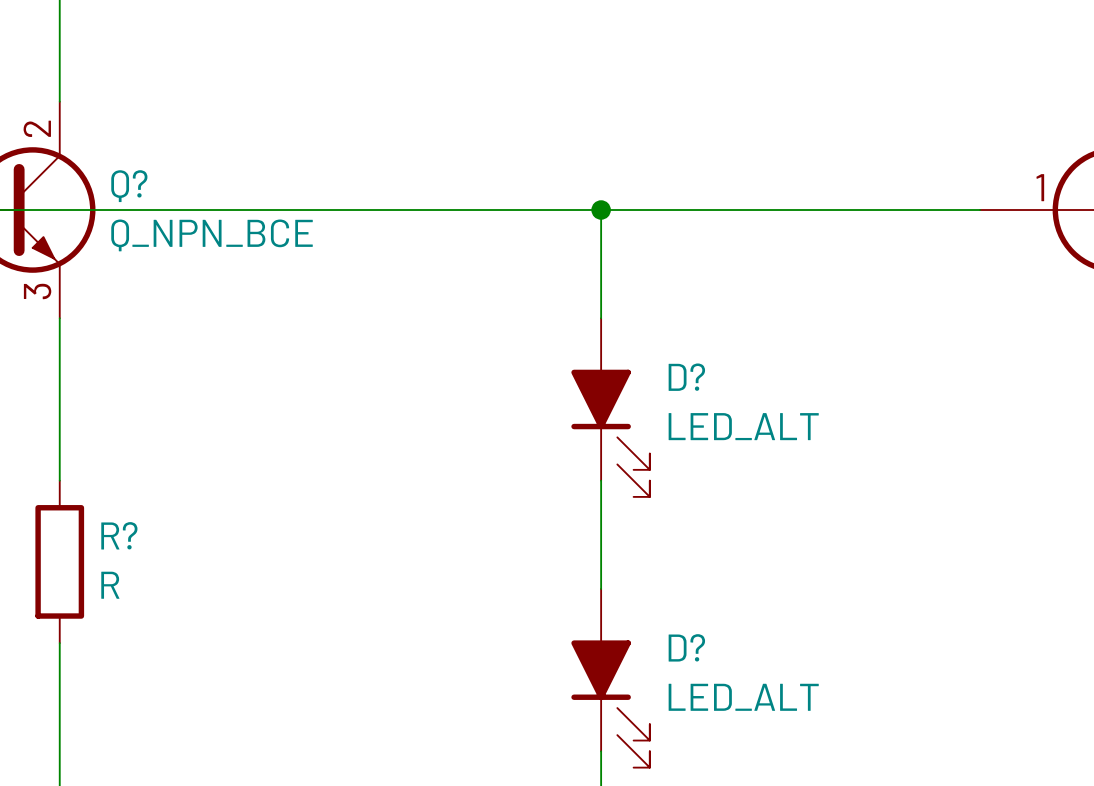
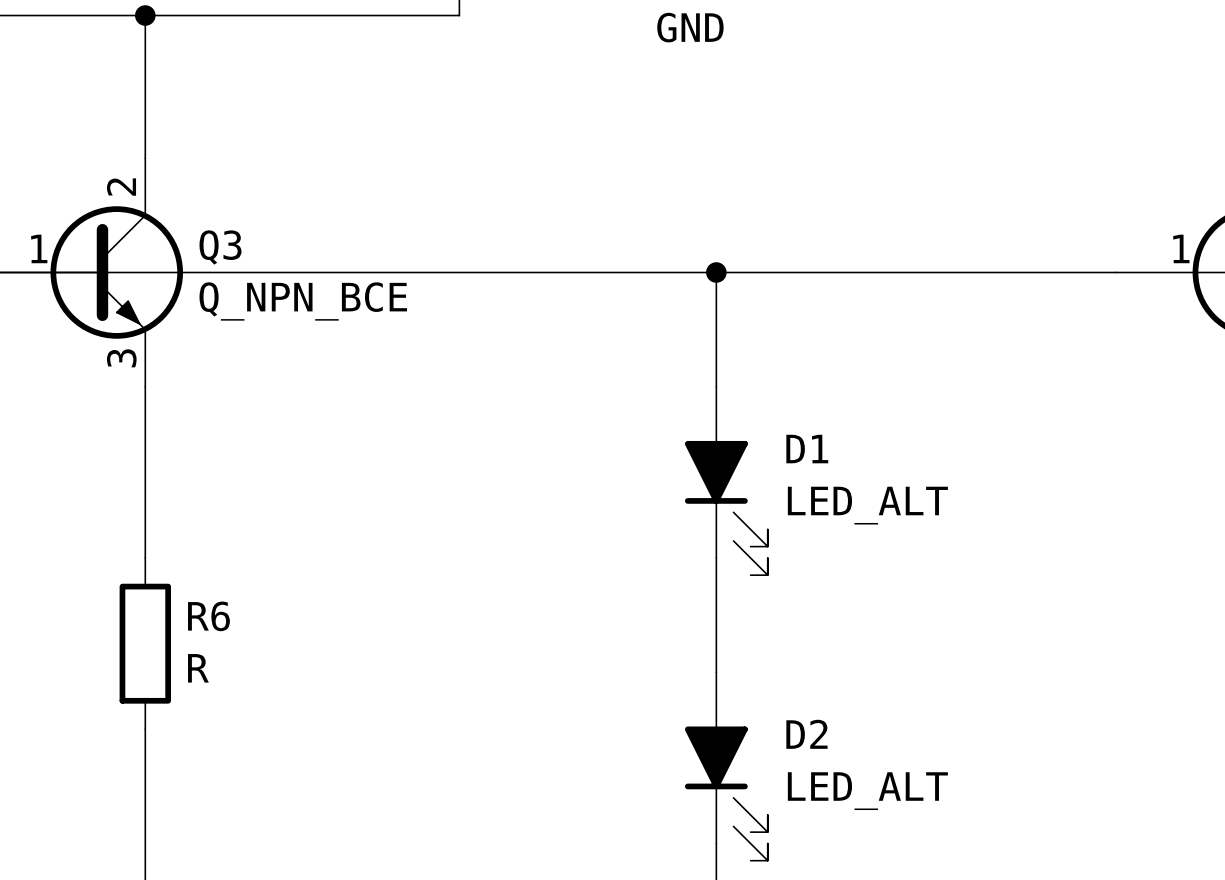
Q? name: Q? (129, 186) -> Q3 (220, 247)
D? name: D? (686, 377) -> D1 (807, 449)
R? name: R? (119, 535) -> R6 (208, 616)
D? name: D? (686, 647) -> D2 (806, 734)

